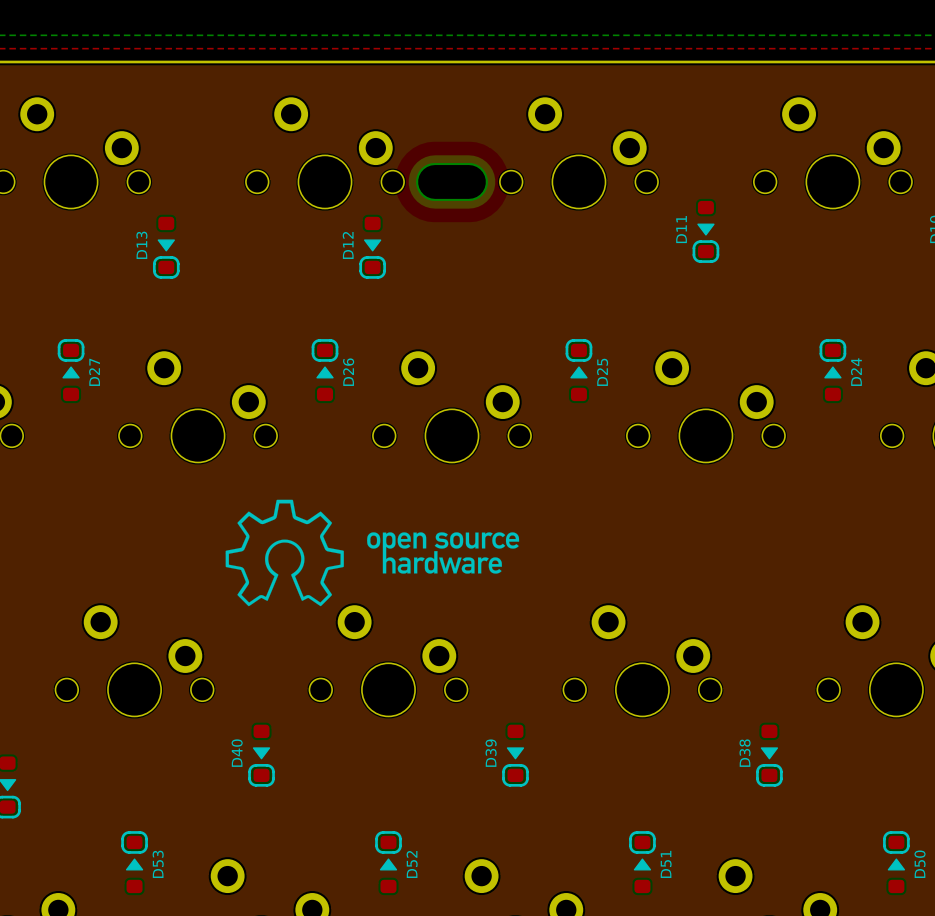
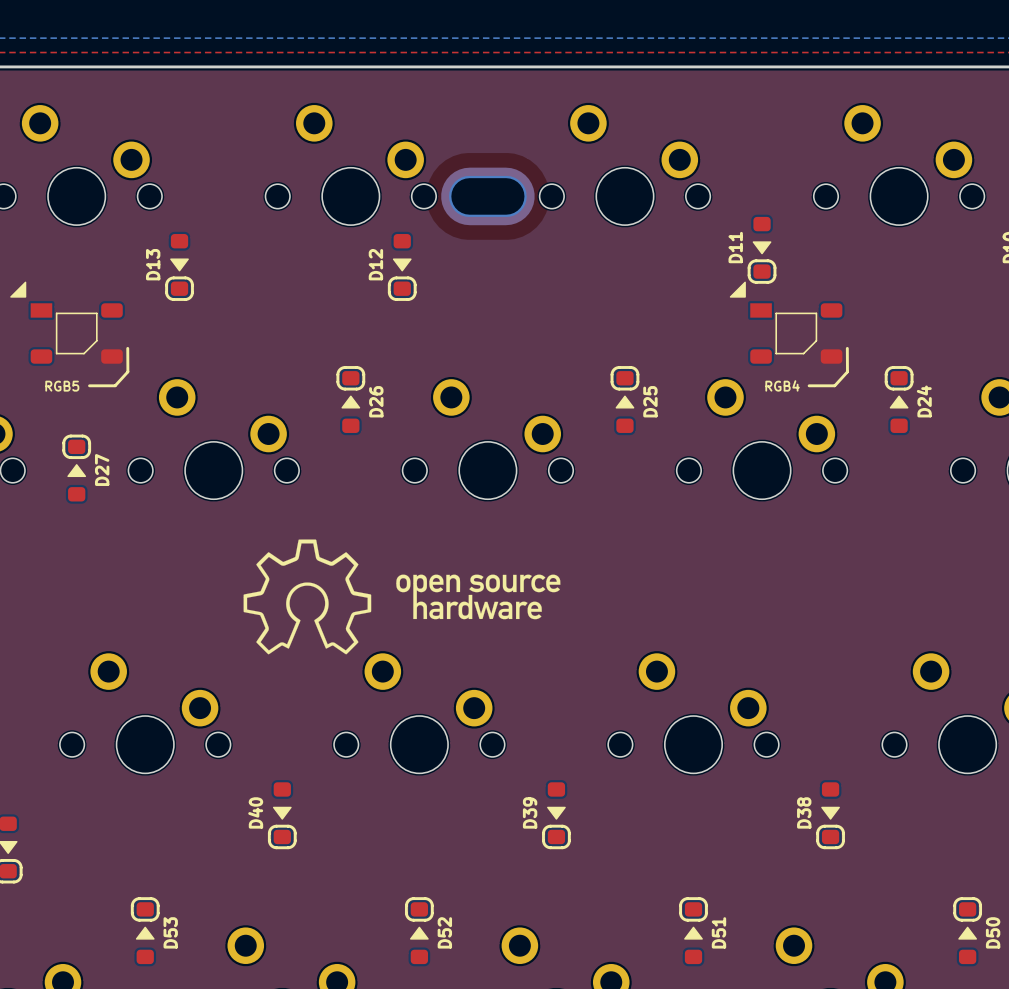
RGB5: none -> (69, 334)
RGB4: none -> (789, 334)
D27 position: (71, 370) -> (76, 468)

